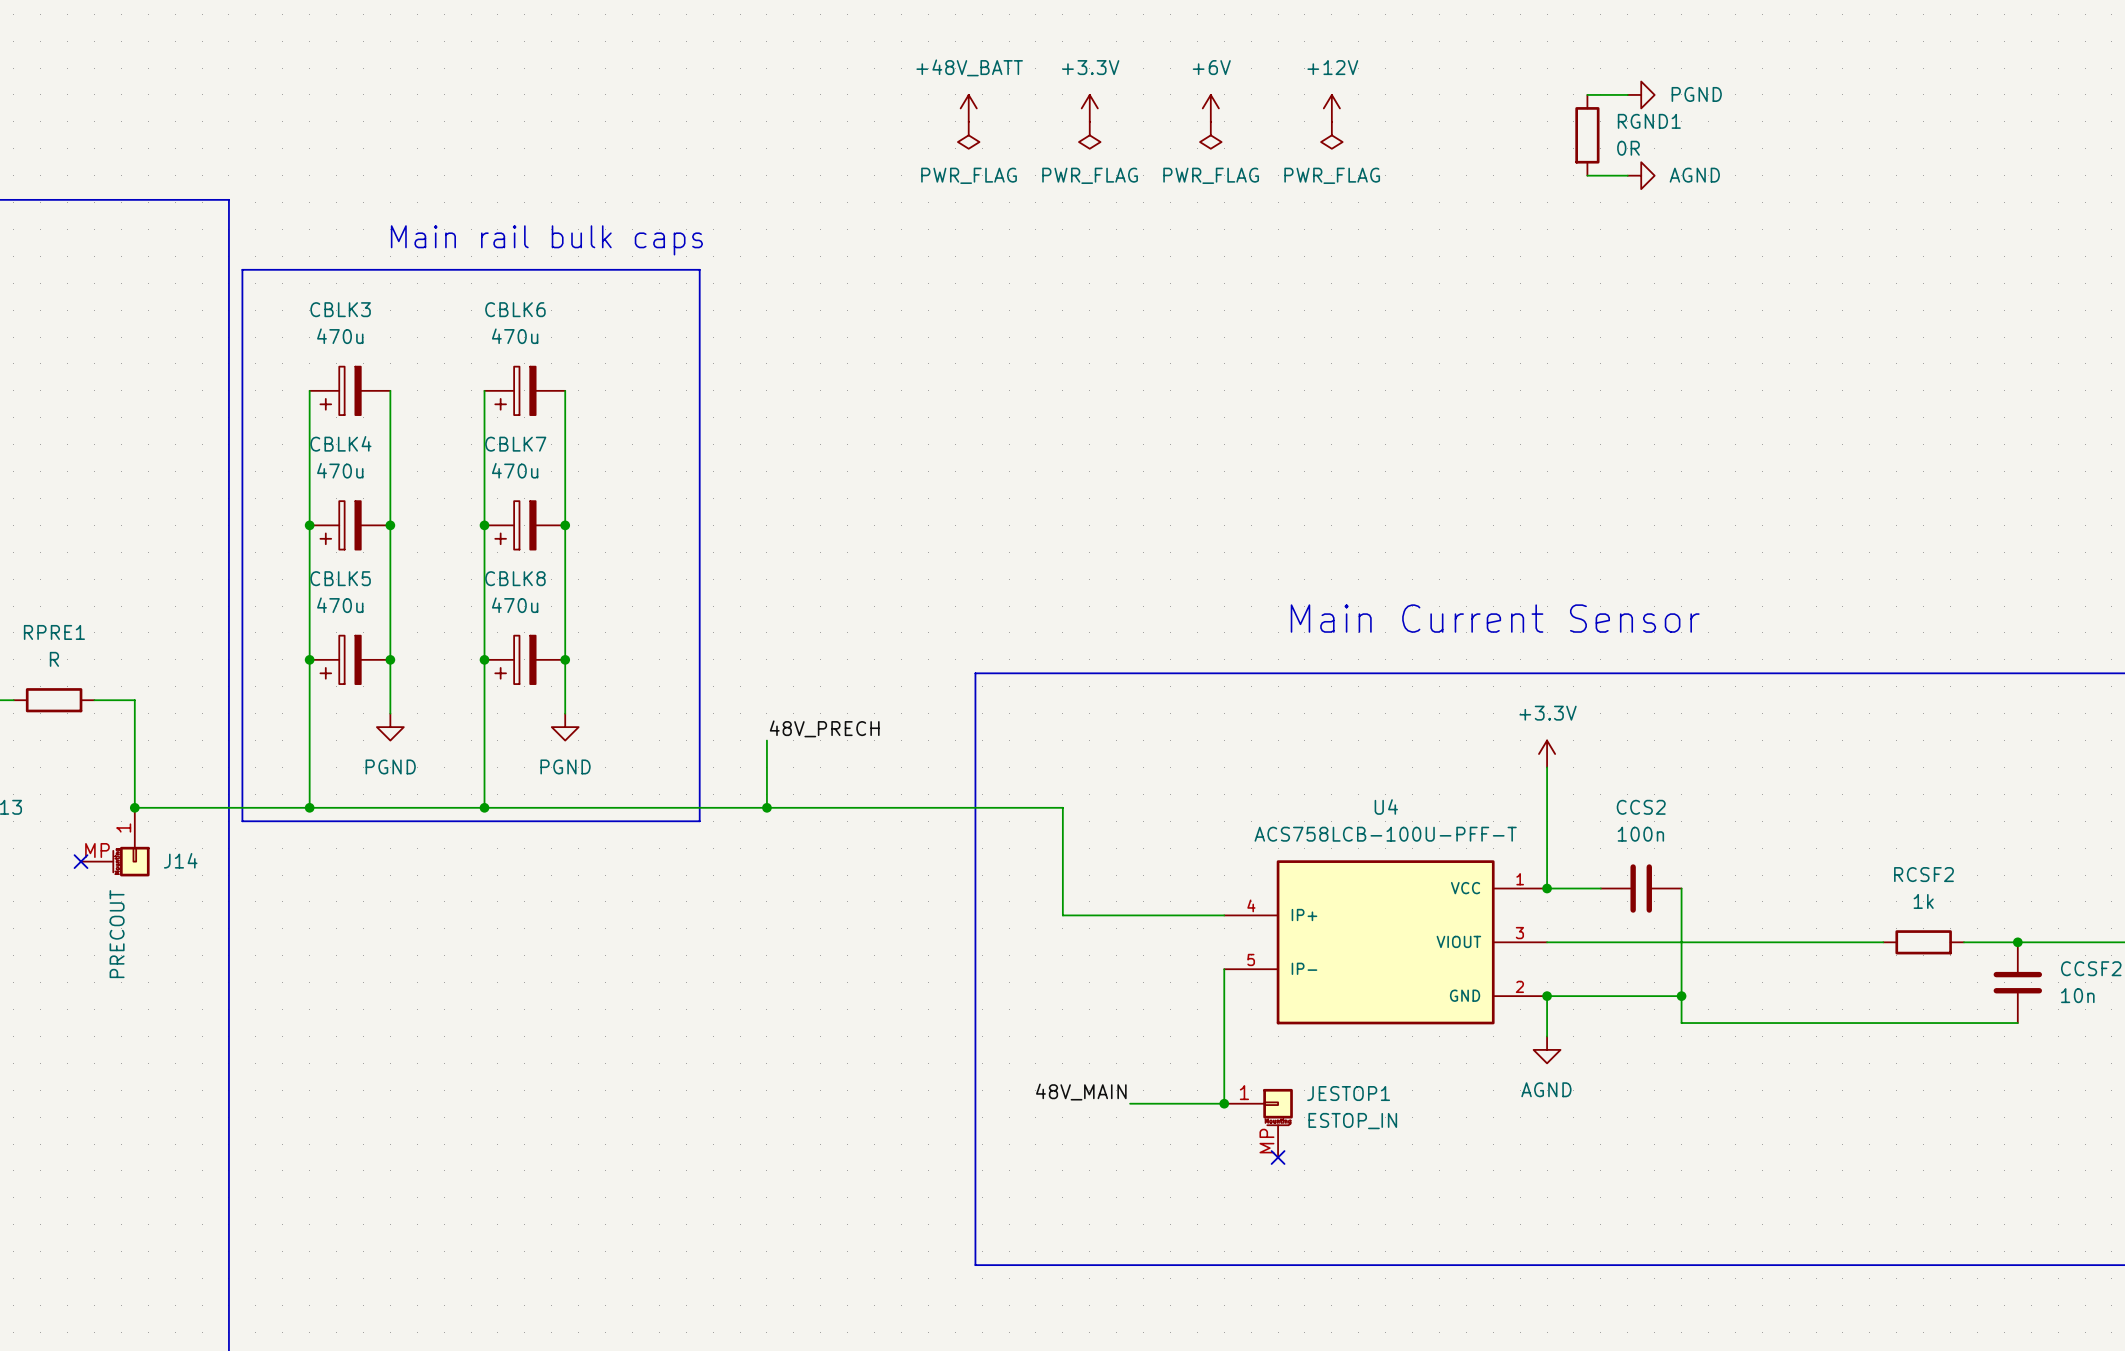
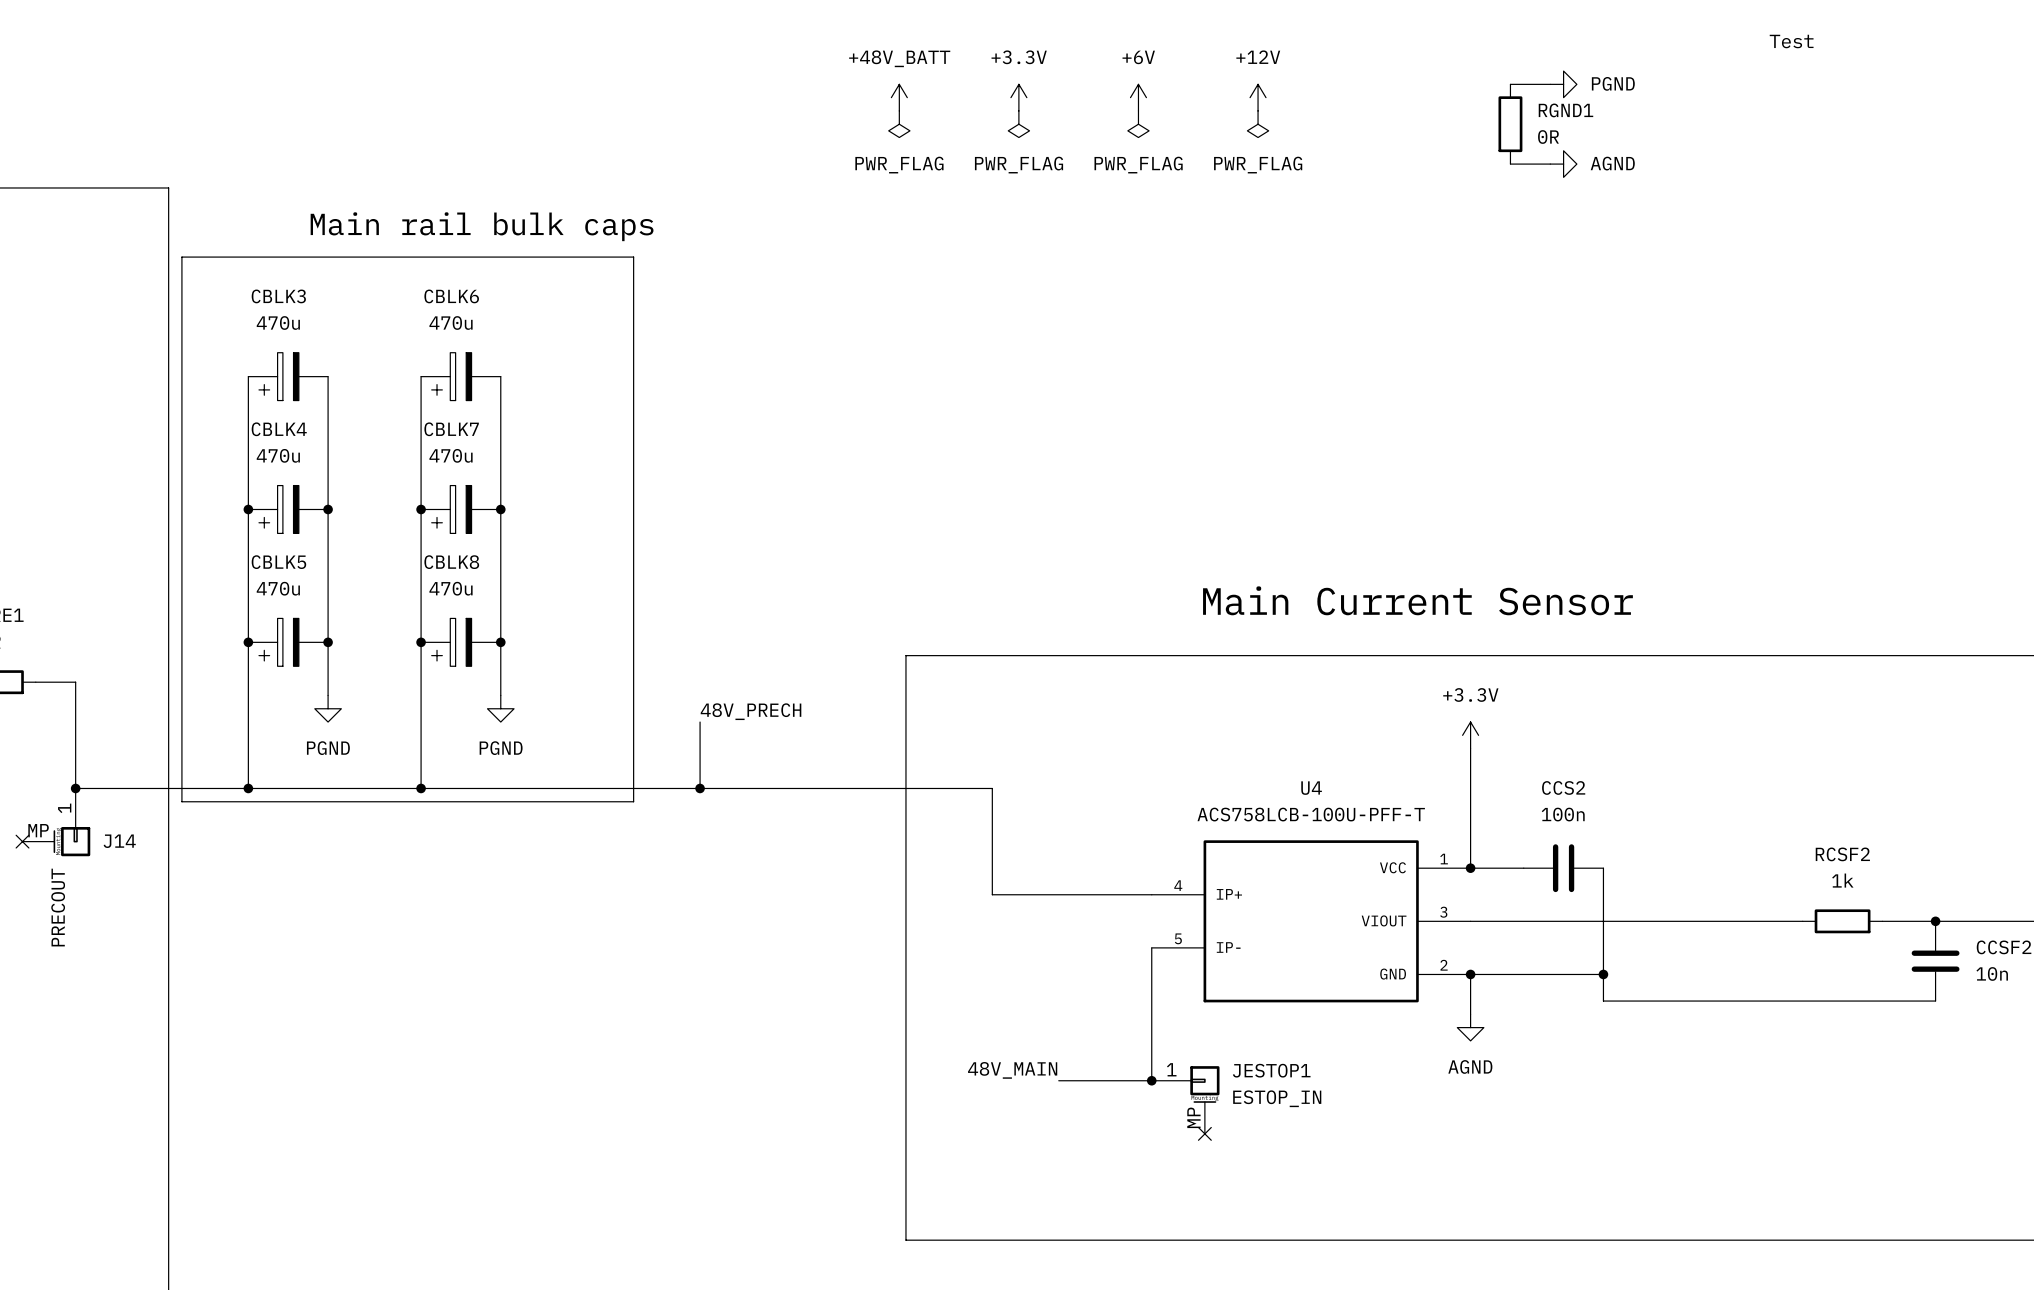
text: none -> Test (1791, 41)

